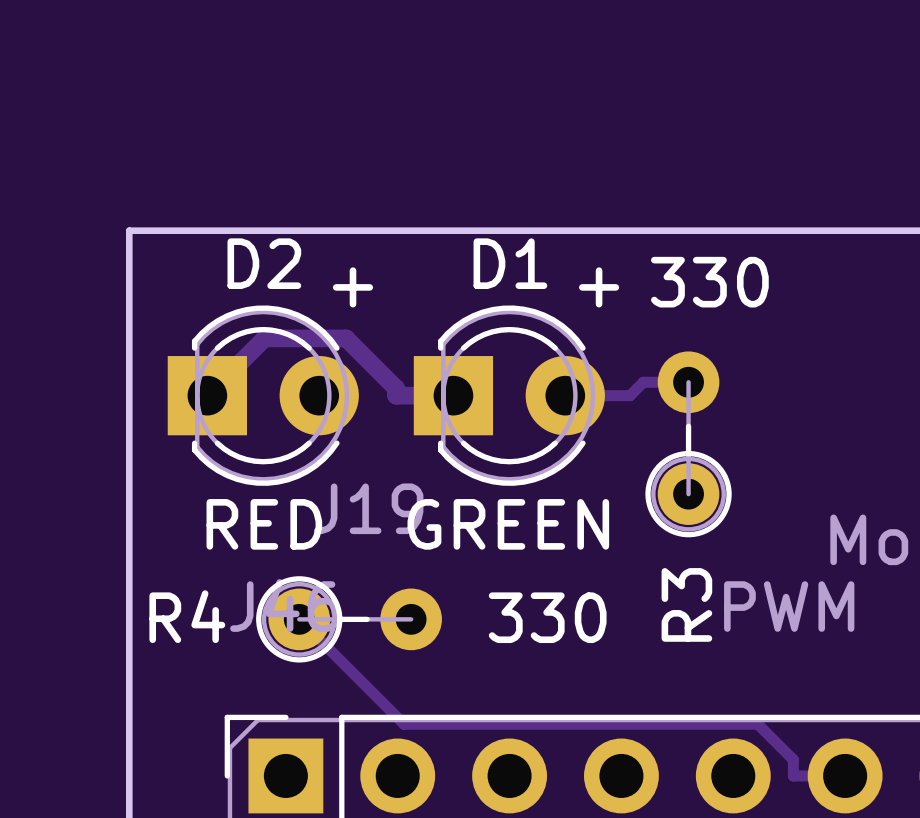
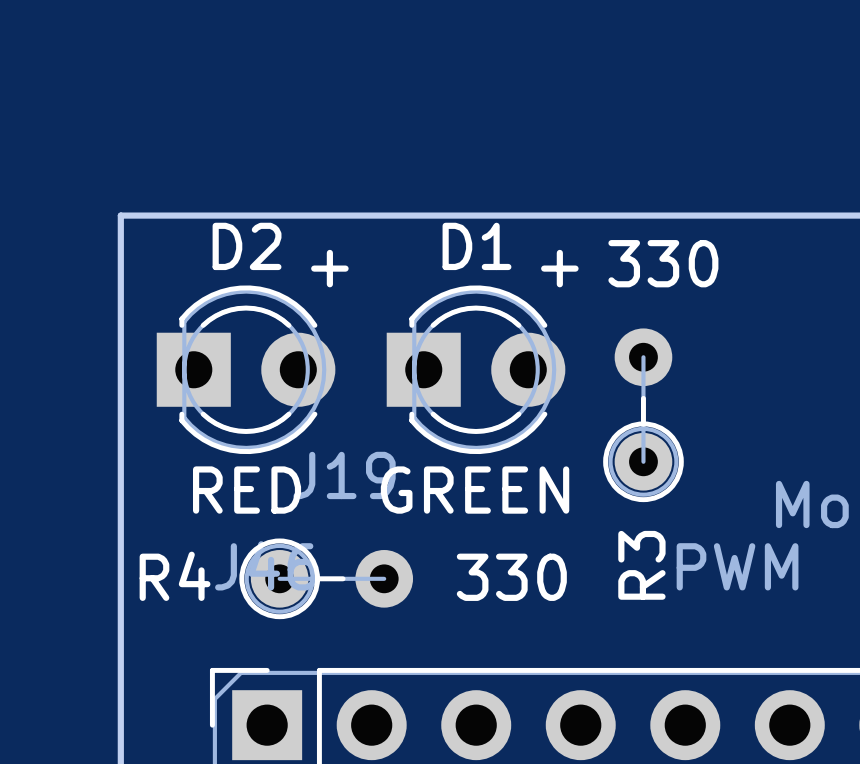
track: (688, 382) (643, 382) (630, 395) (565, 395) -> none
track: (207, 395) (264, 338) (346, 338) (396, 388) (396, 395) (453, 395) -> none
track: (299, 619) (404, 724) (757, 724) (793, 759) (793, 775) (845, 775) -> none

